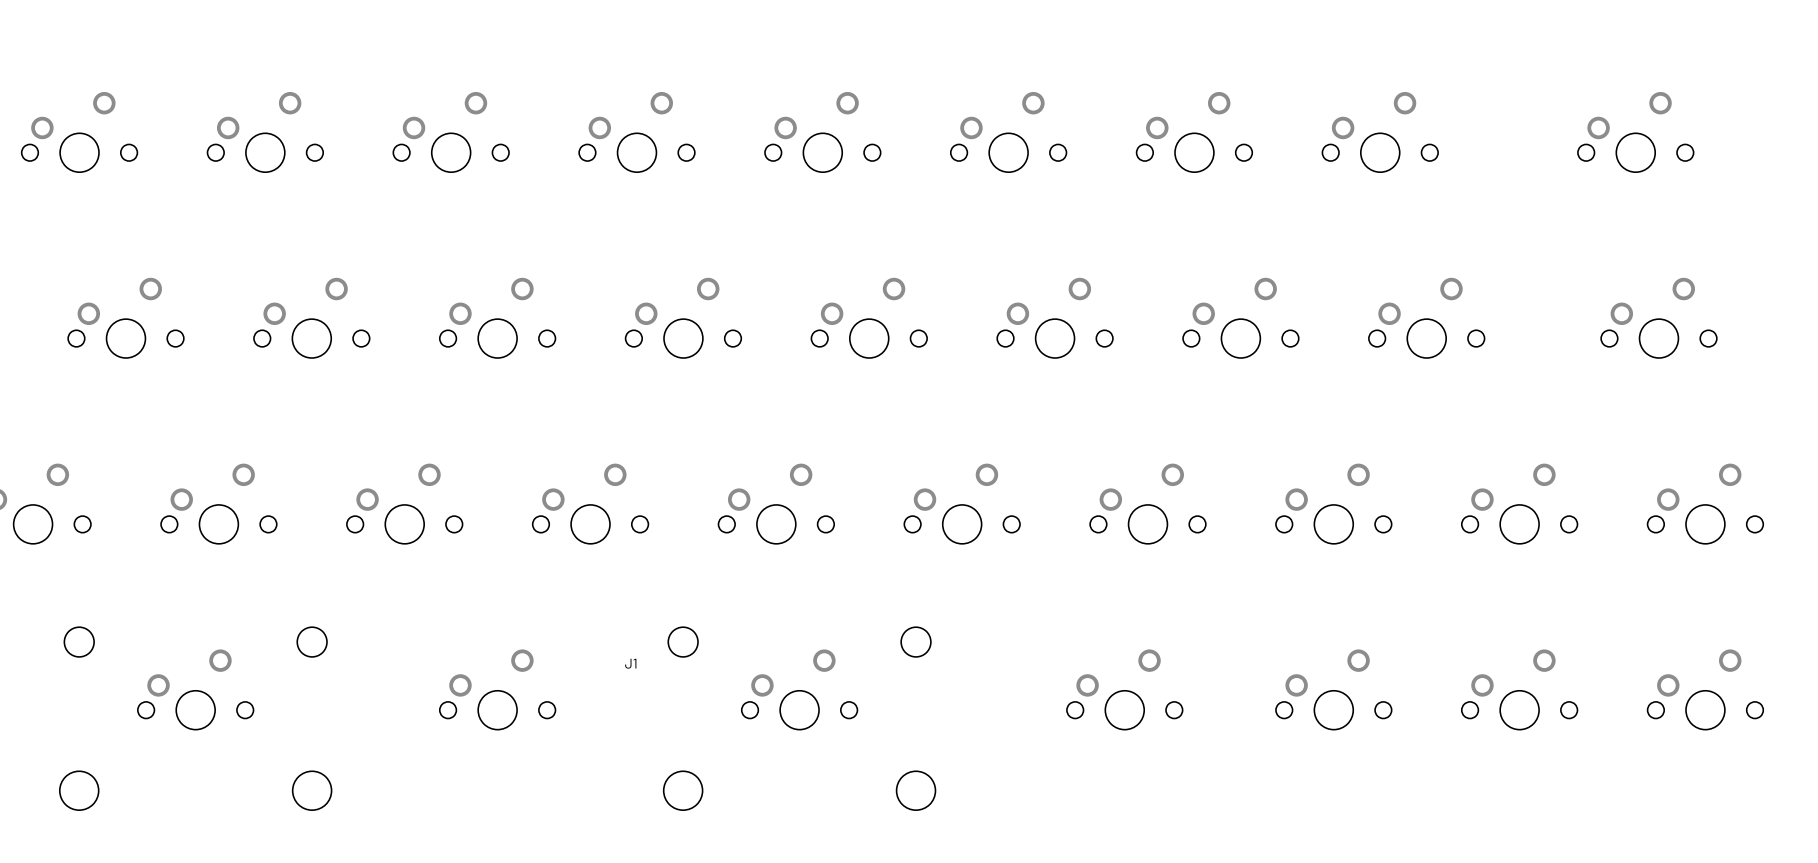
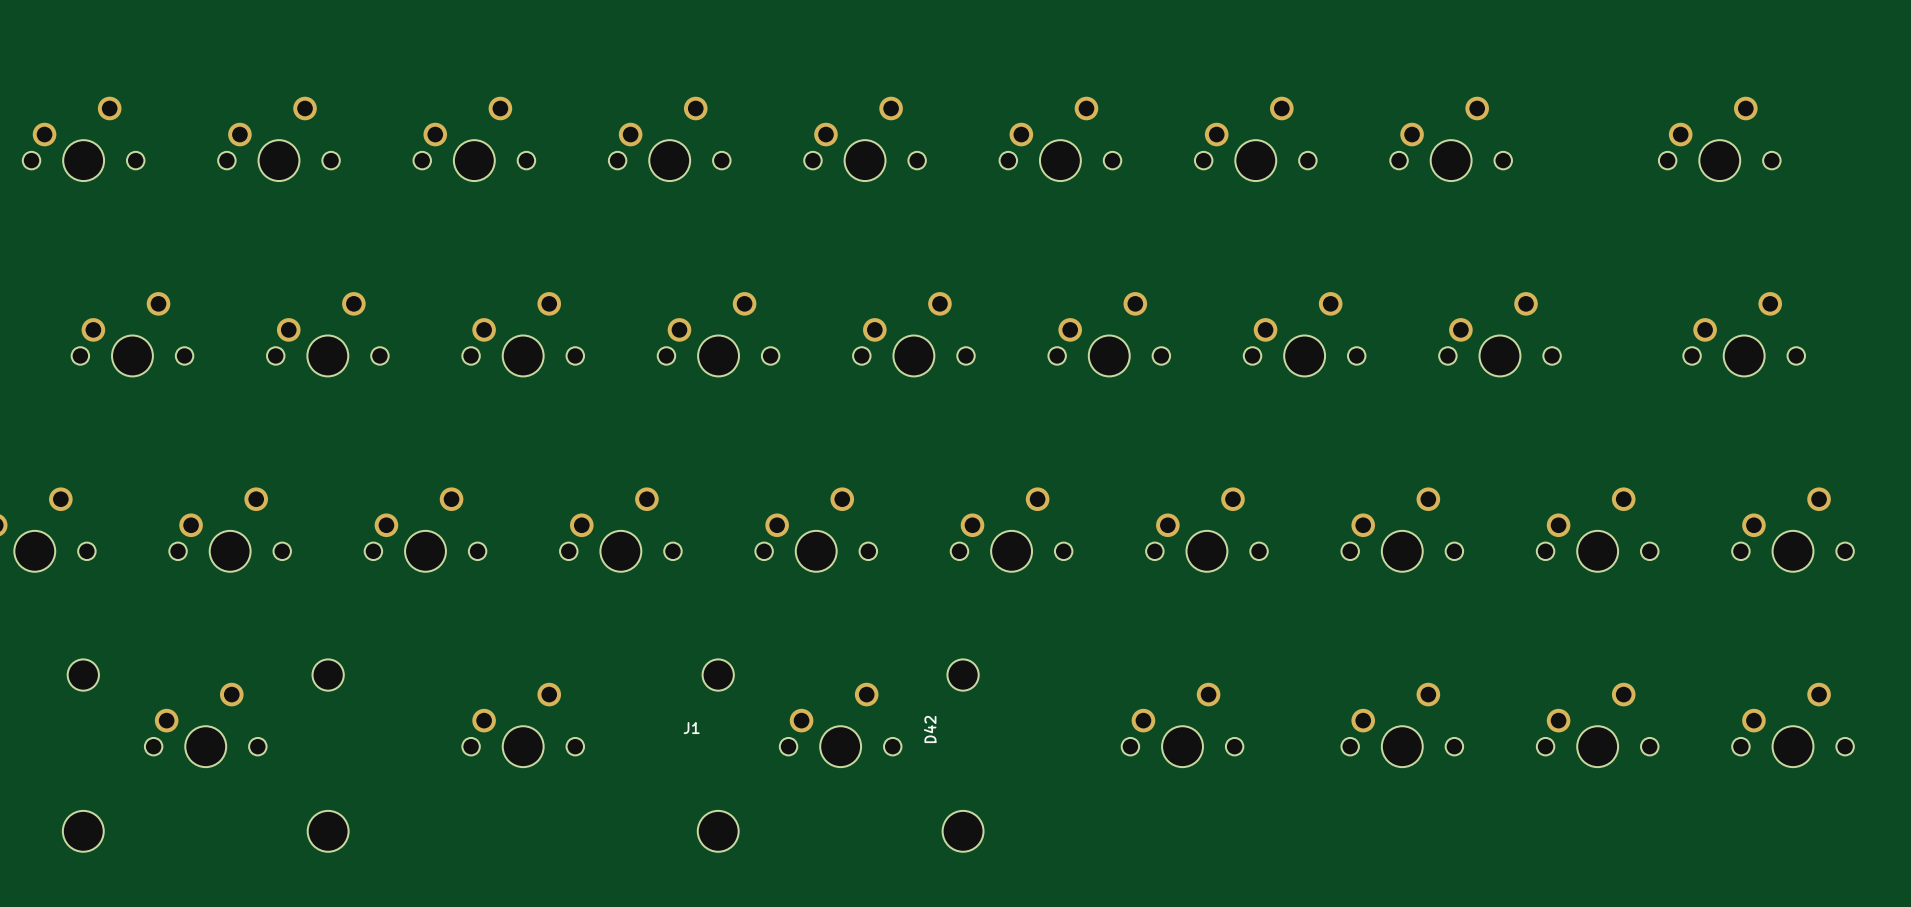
J1 position: (630, 663) -> (691, 728)
D42: none -> (930, 729)

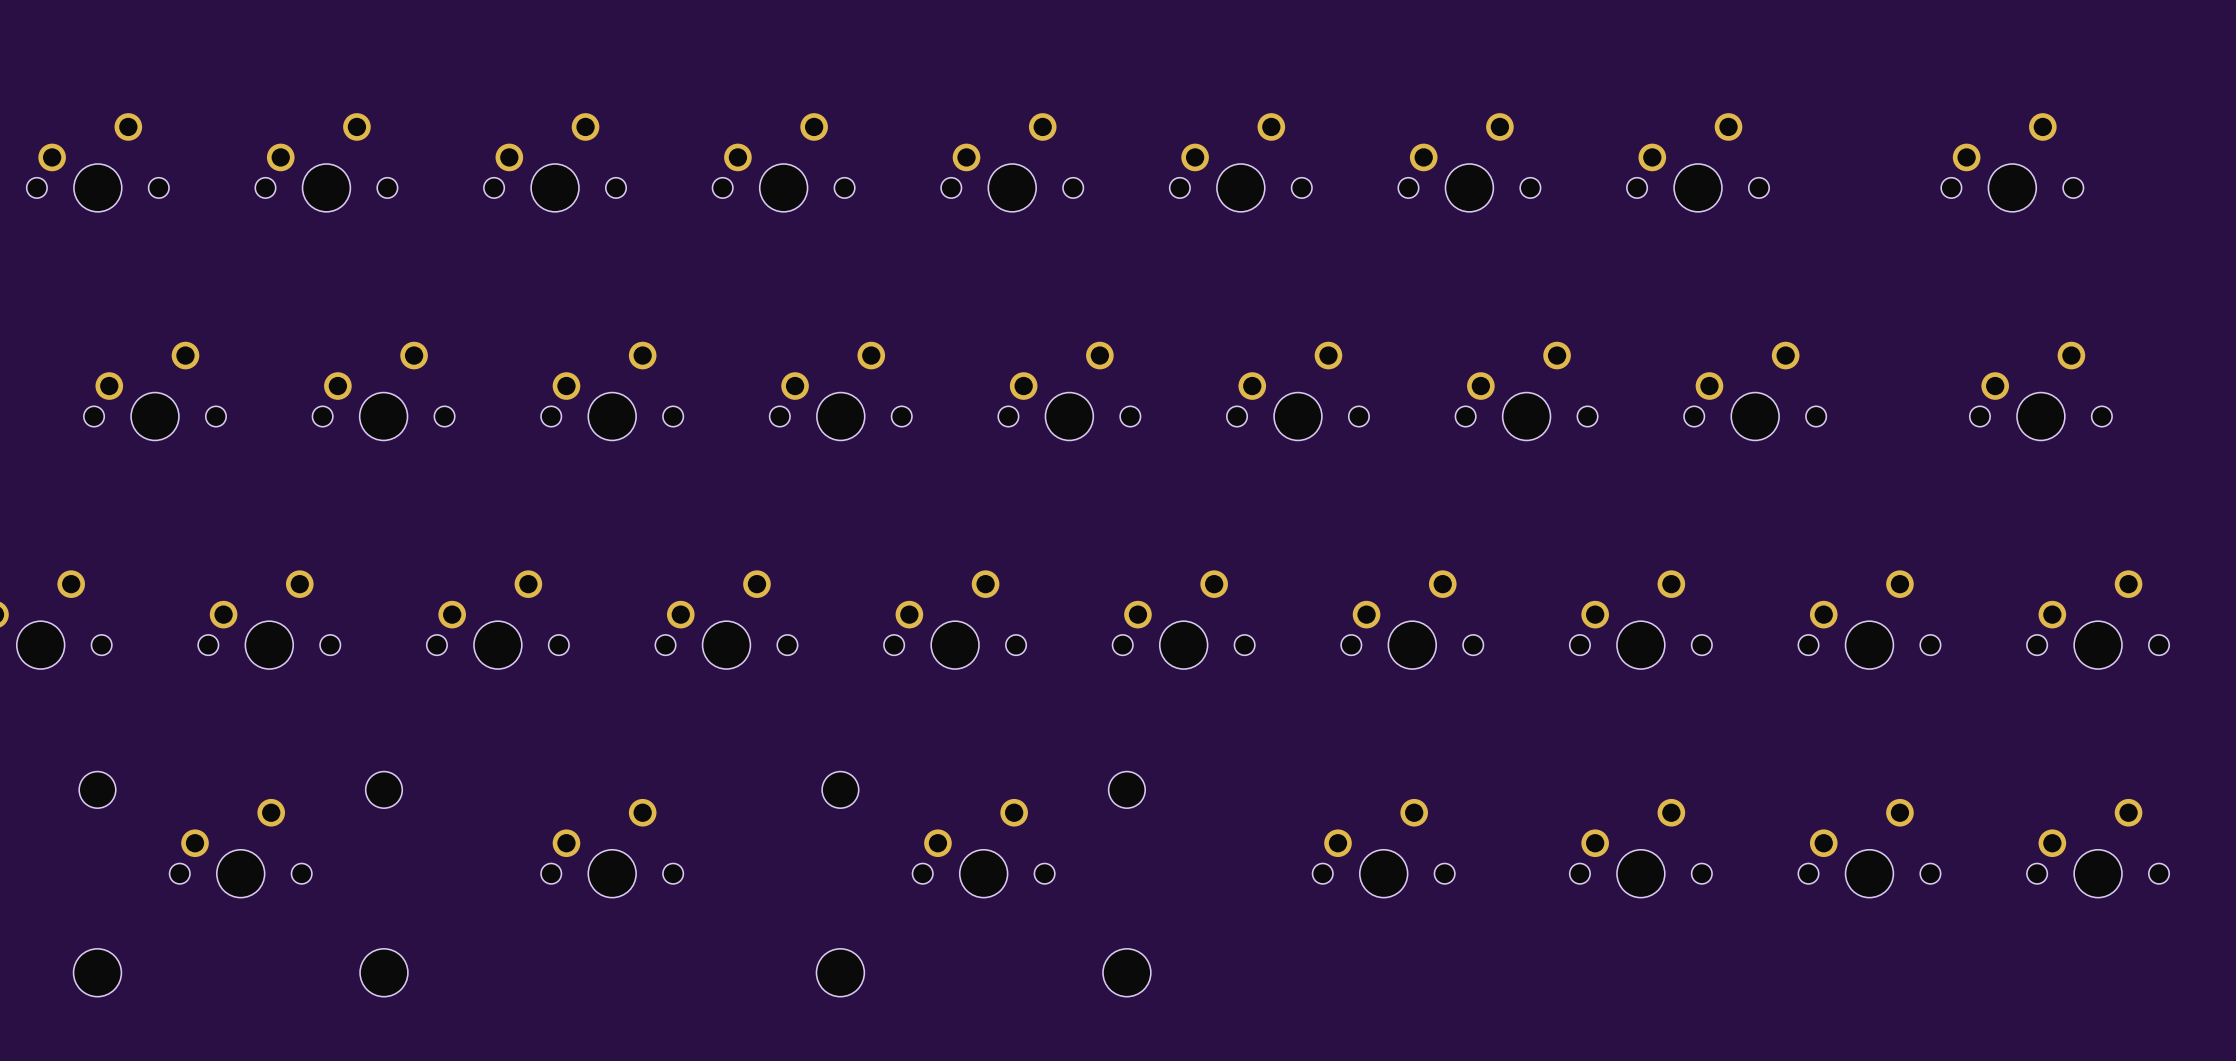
J1: (691, 728) -> none
D42: (930, 729) -> none

